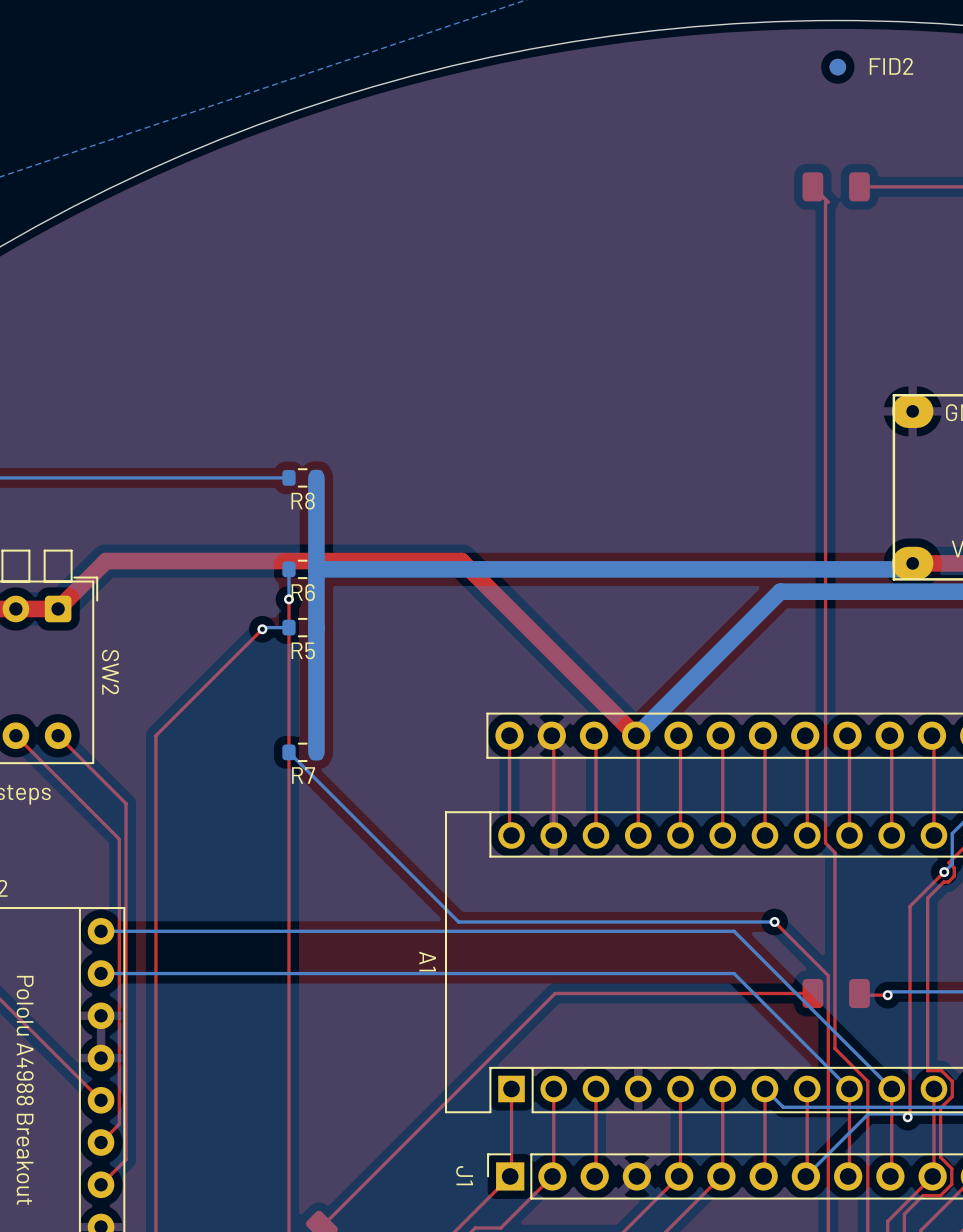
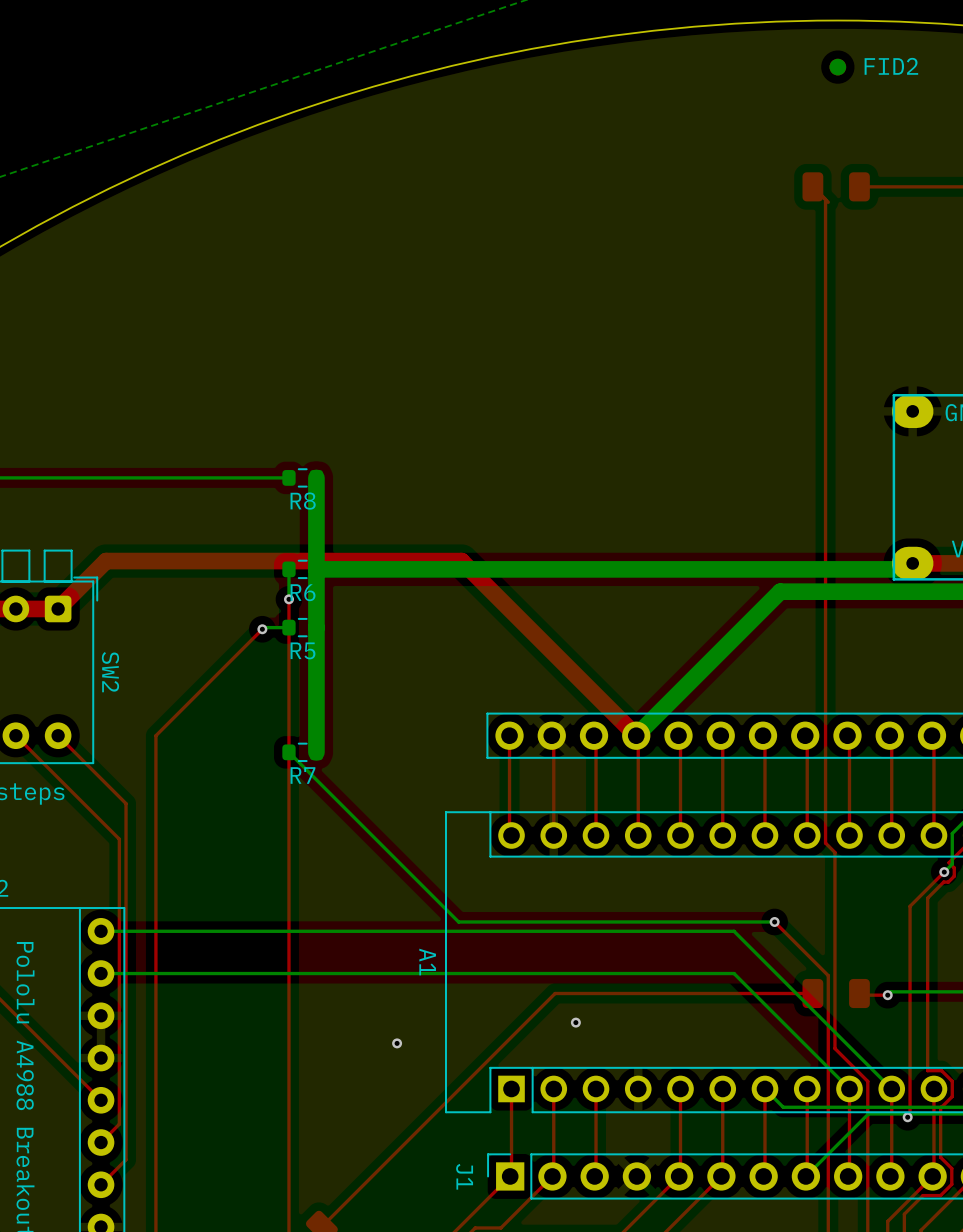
via: none -> (575, 1022)
via: none -> (397, 1043)

